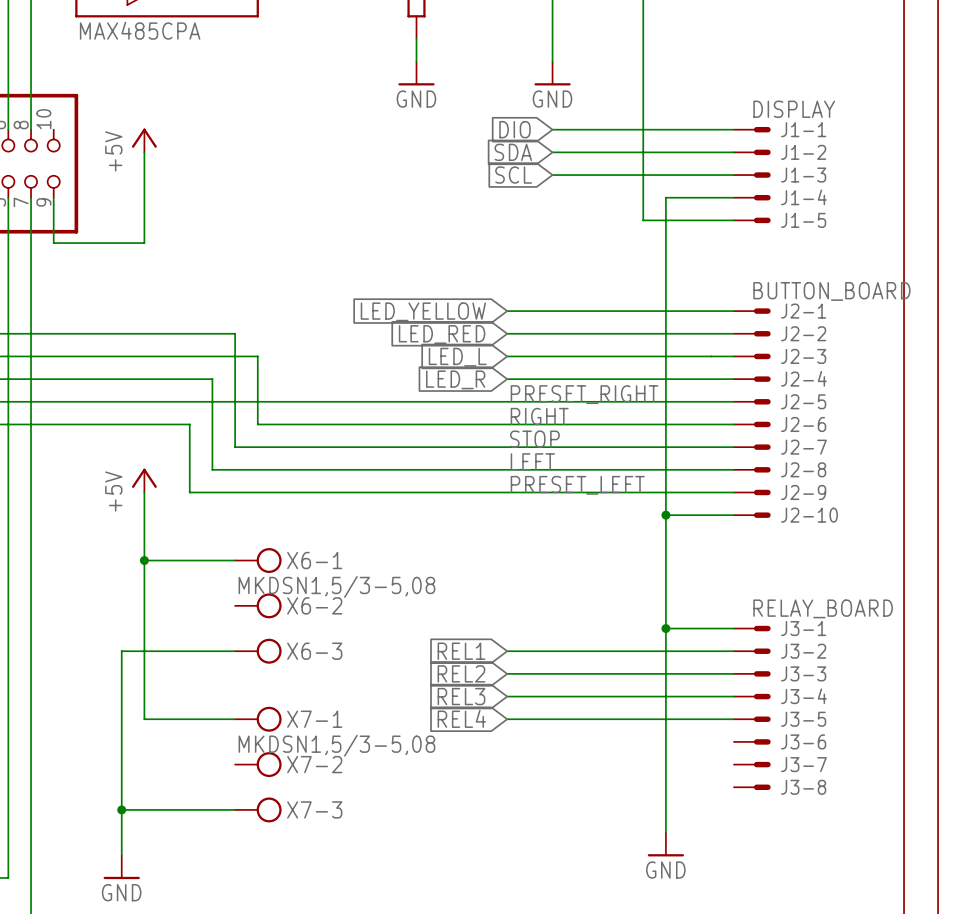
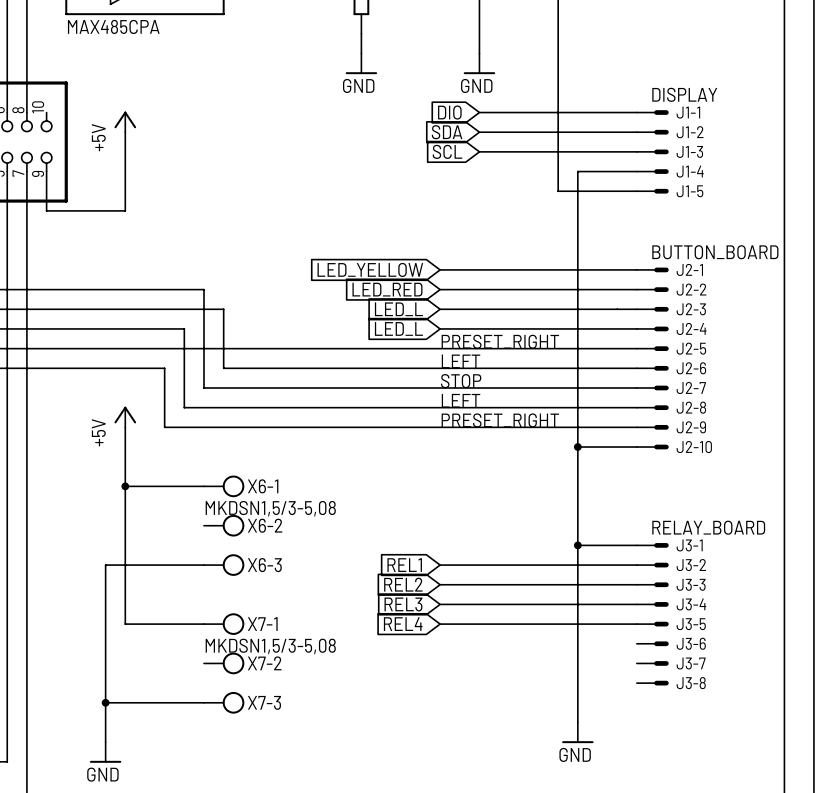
global label: LED_R (455, 379) -> LED_L (398, 328)
label: RIGHT (539, 416) -> LEFT (461, 361)
label: PRESET_LEFT (577, 485) -> PRESET_RIGHT (500, 420)

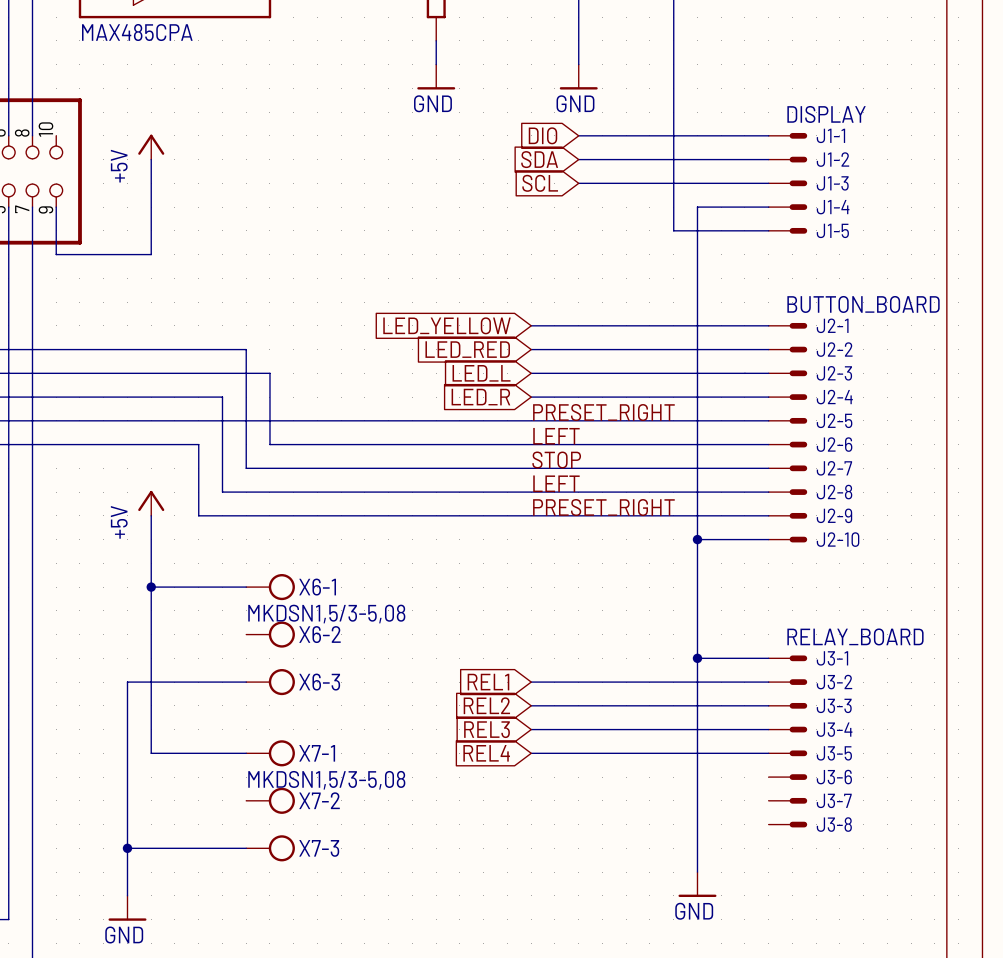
global label: LED_L (398, 328) -> LED_R (480, 397)

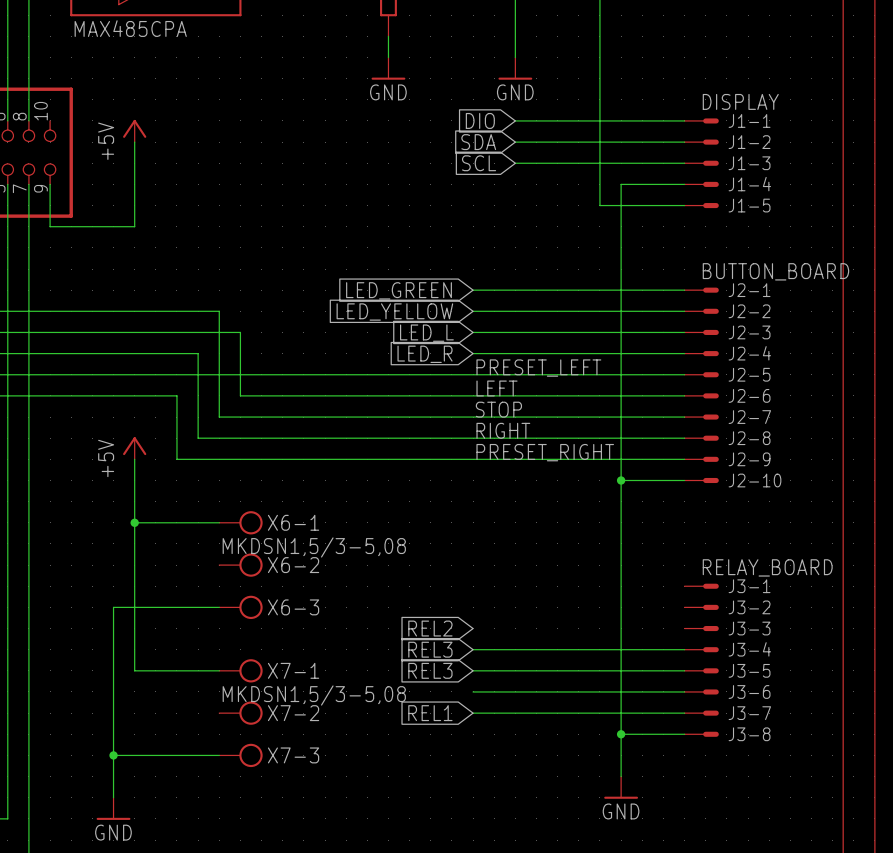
global label: LED_YELLOW (446, 325) -> LED_GREEN (399, 290)
global label: LED_RED (467, 349) -> LED_YELLOW (394, 312)
label: PRESET_RIGHT (603, 412) -> PRESET_LEFT (538, 368)
label: LEFT (556, 483) -> RIGHT (503, 430)
wire: (697, 658) (768, 658) -> (621, 734) (684, 734)
junction: (697, 658) -> none
global label position: REL1 (488, 682) -> REL1 (430, 713)
wire: (531, 682) (768, 682) -> (473, 691) (684, 691)
wire: (531, 705) (768, 705) -> (473, 713) (684, 713)
global label: REL4 (486, 753) -> REL3 (430, 670)
junction: none -> (621, 734)

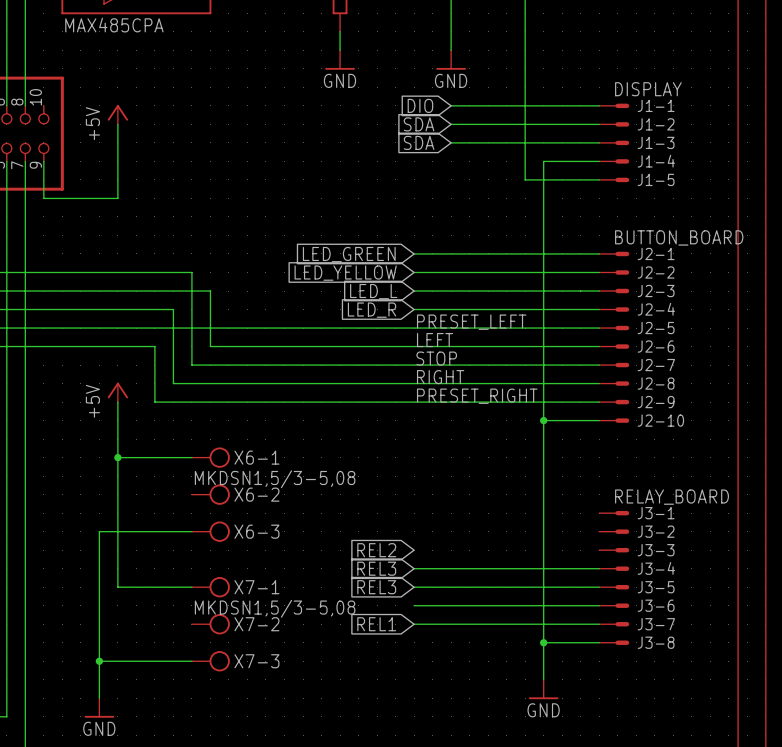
global label: SCL (479, 163) -> SDA (419, 142)

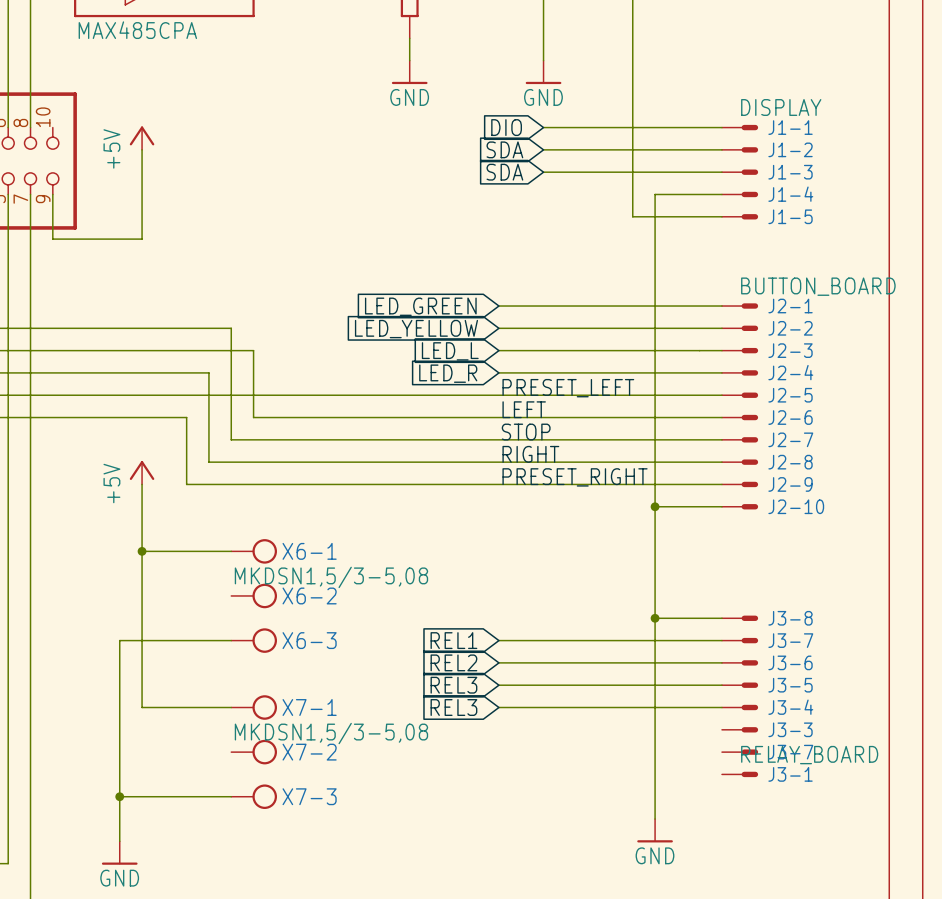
J3-1 value: RELAY_BOARD (672, 497) -> none
junction: none -> (655, 618)
J3-1 name: J3-1 (656, 513) -> J3-8 (790, 618)
J3-2 name: J3-2 (656, 531) -> J3-7 (790, 640)
J3-3 name: J3-3 (656, 550) -> J3-6 (790, 662)
J3-4 name: J3-4 (656, 568) -> J3-5 (790, 685)
J3-5 name: J3-5 (656, 587) -> J3-4 (790, 707)
wire: (414, 605) (599, 605) -> (498, 640) (721, 640)
J3-6 name: J3-6 (656, 605) -> J3-3 (790, 729)
global label position: REL1 (376, 624) -> REL1 (453, 640)
wire: (414, 624) (599, 624) -> (498, 662) (721, 662)
J3-8 value: none -> RELAY_BOARD (809, 755)
wire: (543, 642) (599, 642) -> (655, 618) (721, 618)
junction: (543, 642) -> none
J3-8 name: J3-8 (656, 642) -> J3-1 (790, 774)

